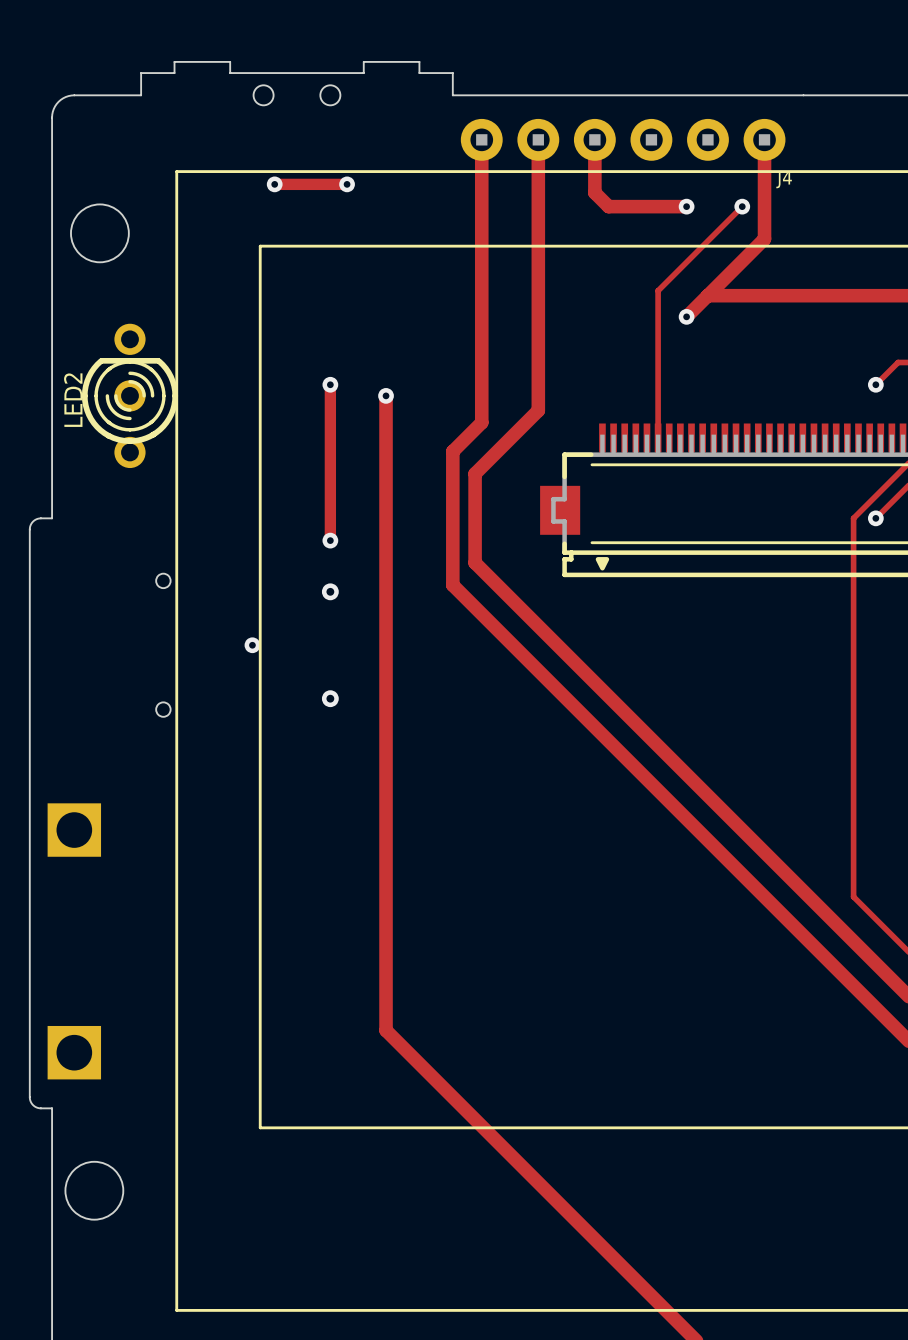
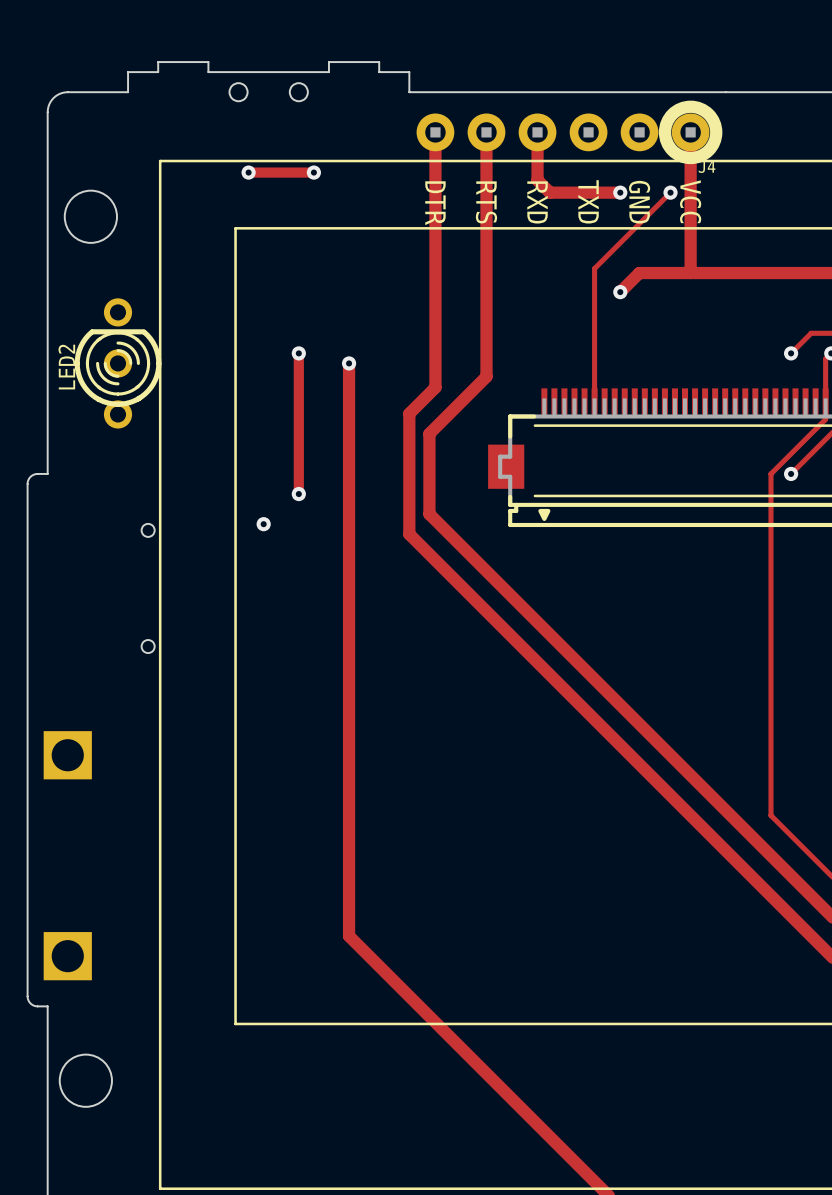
drawing: none -> [658, 100, 723, 165]
text: none -> RTS (486, 202)
text: none -> TXD (588, 201)
text: none -> VCC (690, 201)
text: none -> DTR (435, 203)
text: none -> RXD (537, 202)
text: none -> GND (639, 202)
track: (764, 238) (707, 295) -> (690, 221) (690, 273)
via: (330, 591) -> none
via position: (252, 645) -> (263, 524)
via: (330, 698) -> none

